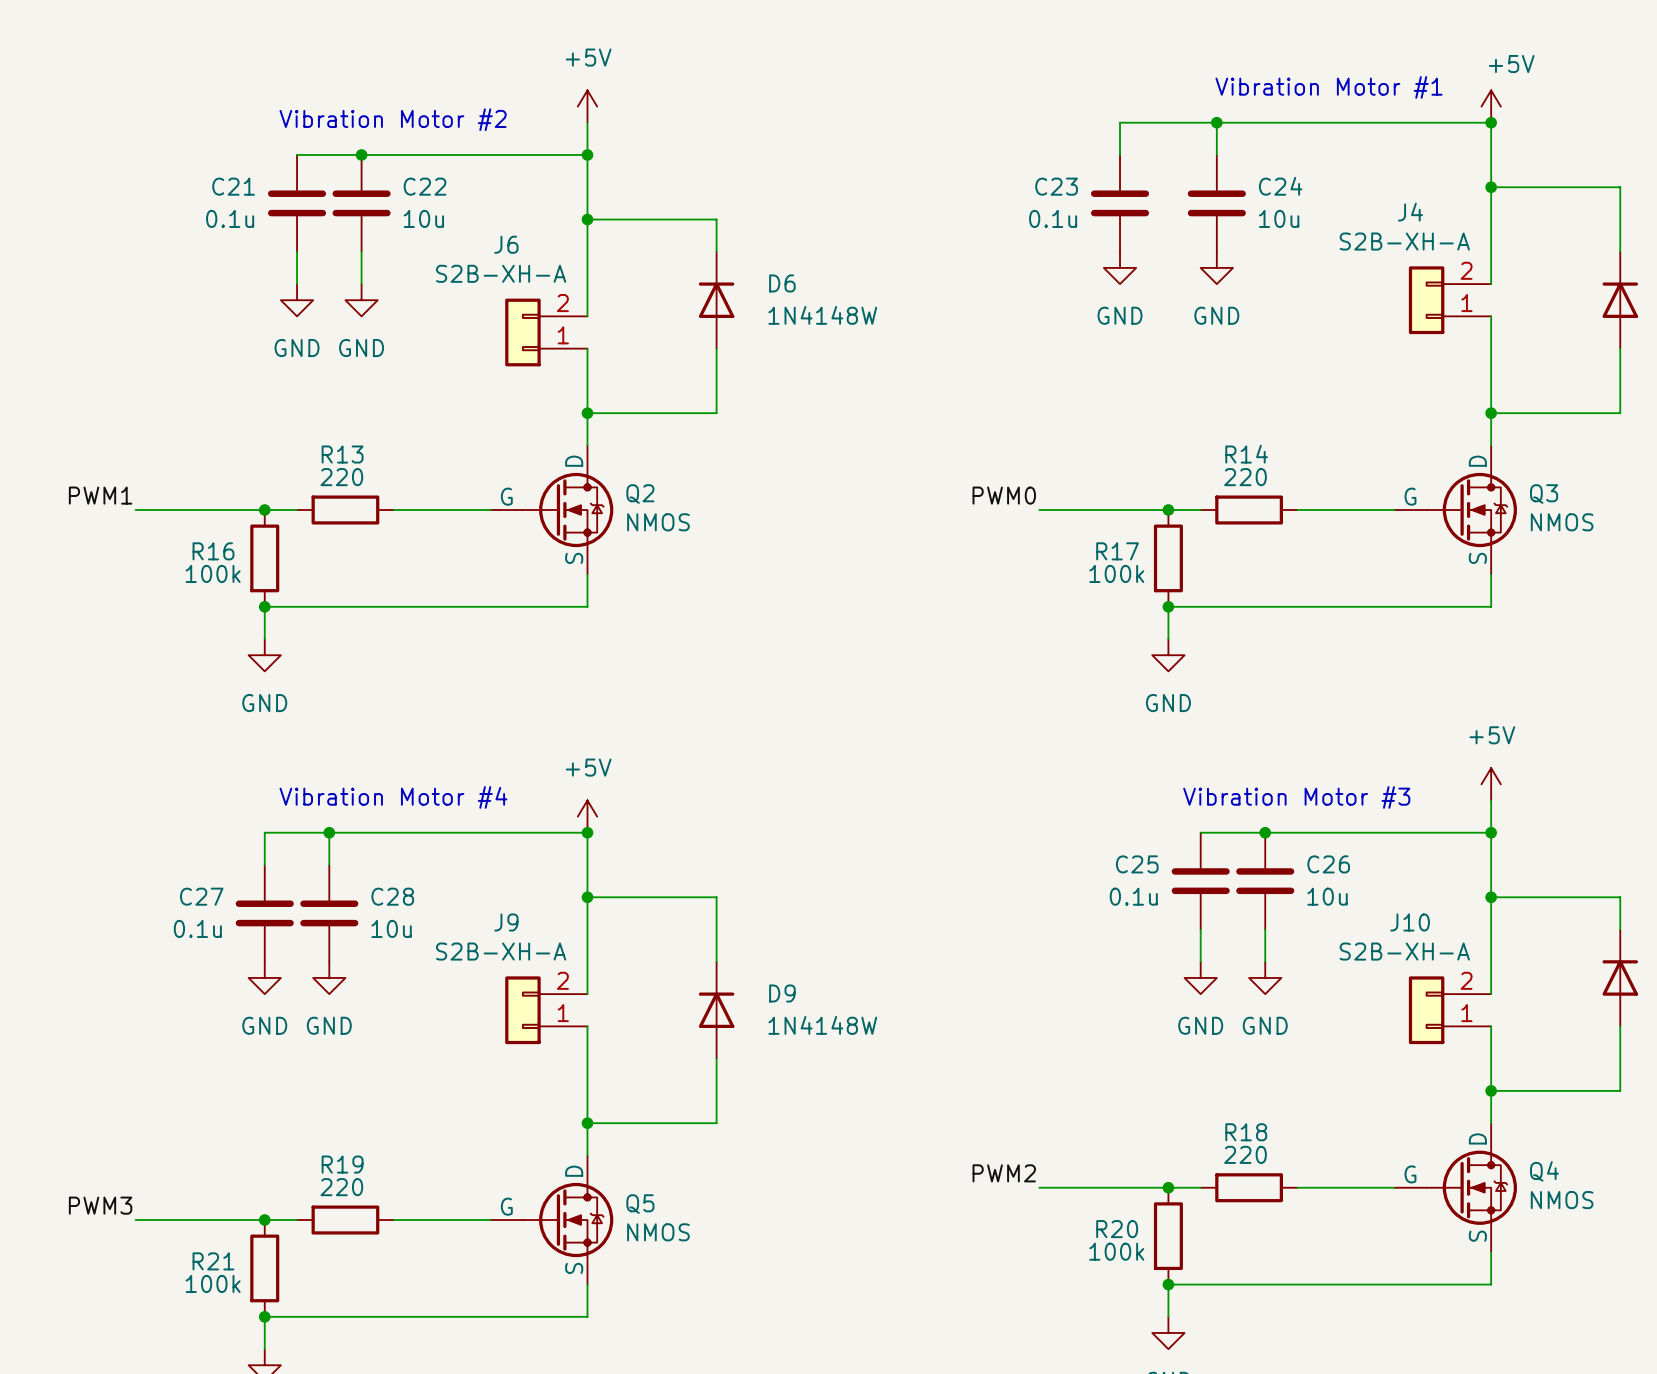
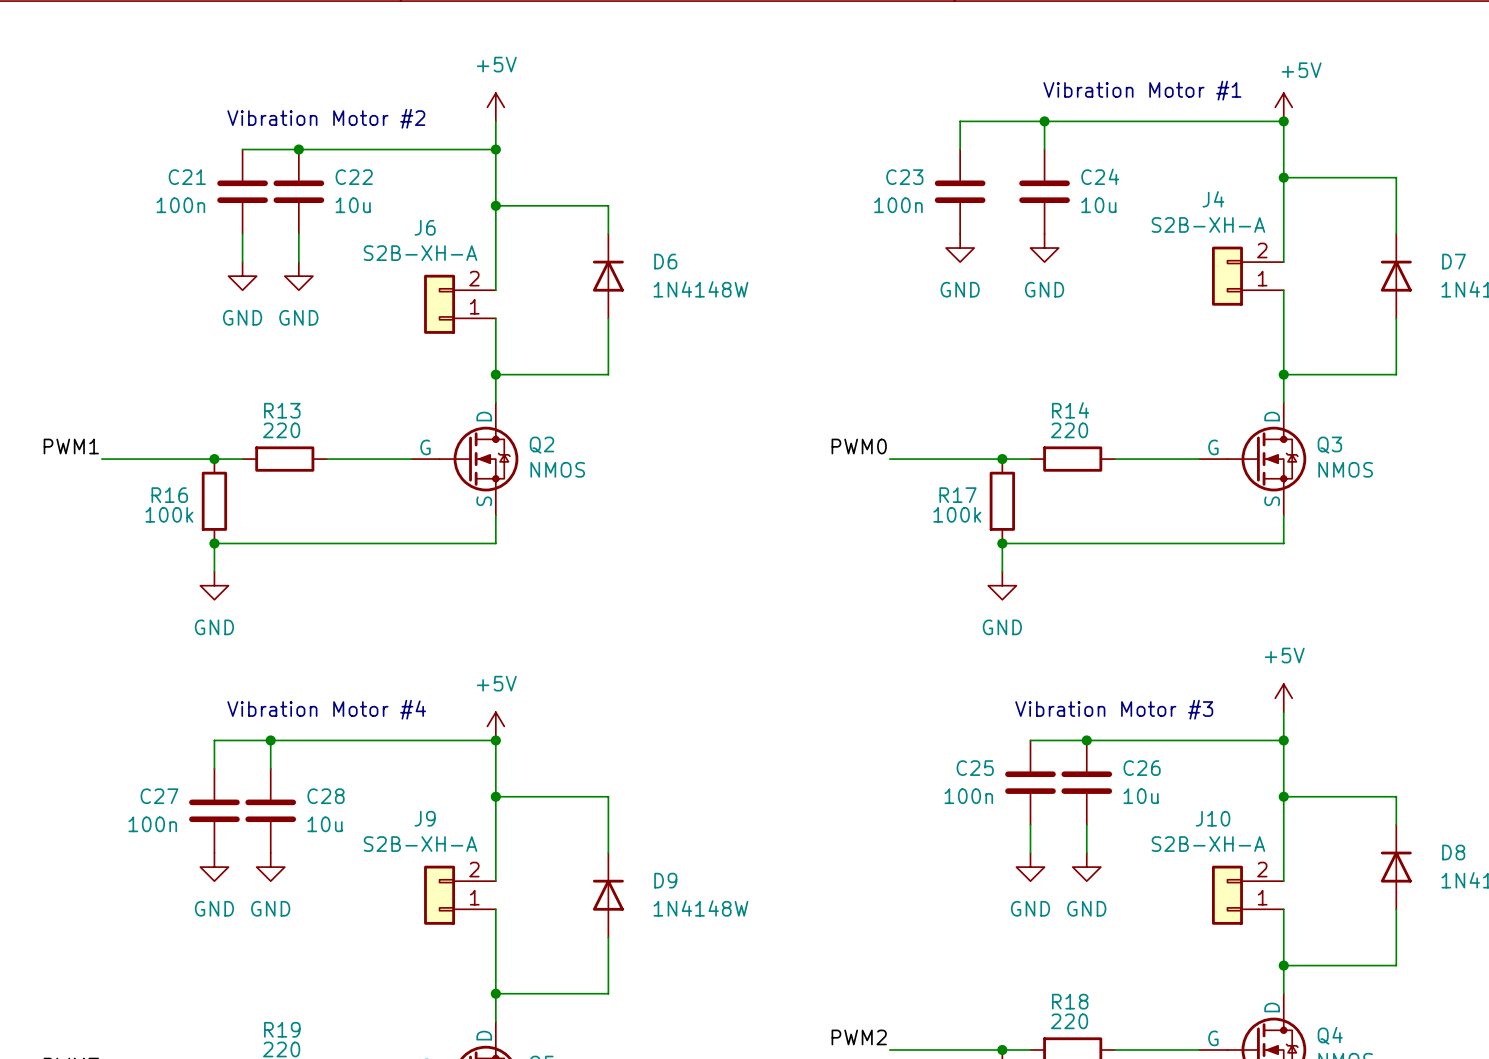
C21 value: 0.1u (230, 218) -> 100n (180, 205)
C23 value: 0.1u (1053, 218) -> 100n (898, 205)
C25 value: 0.1u (1133, 896) -> 100n (968, 796)
C27 value: 0.1u (197, 928) -> 100n (152, 824)

